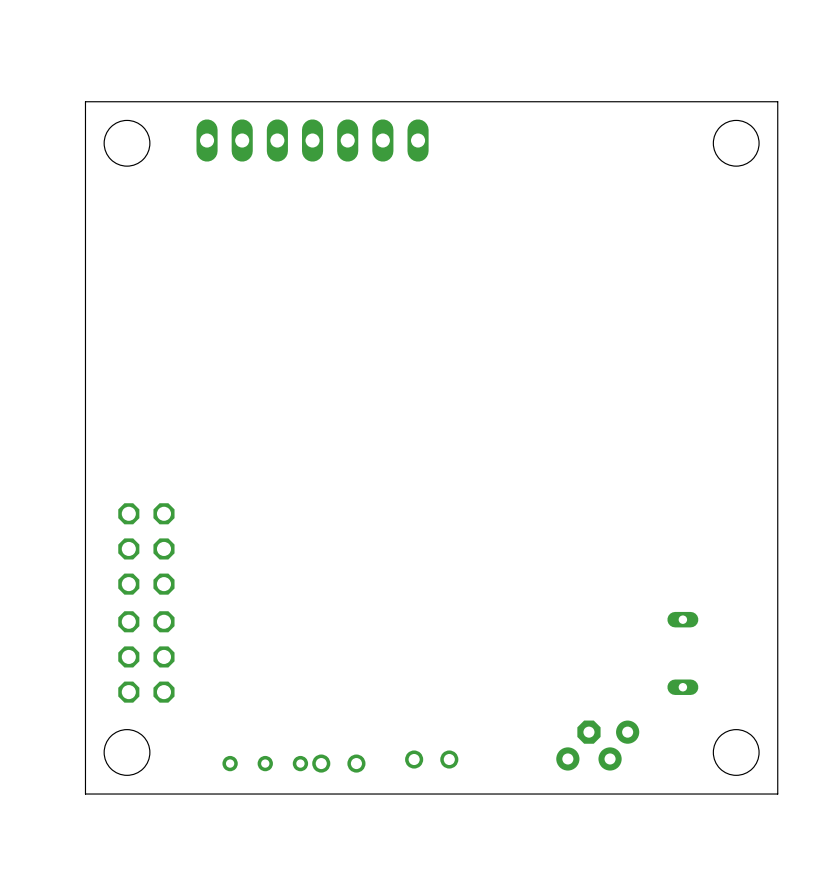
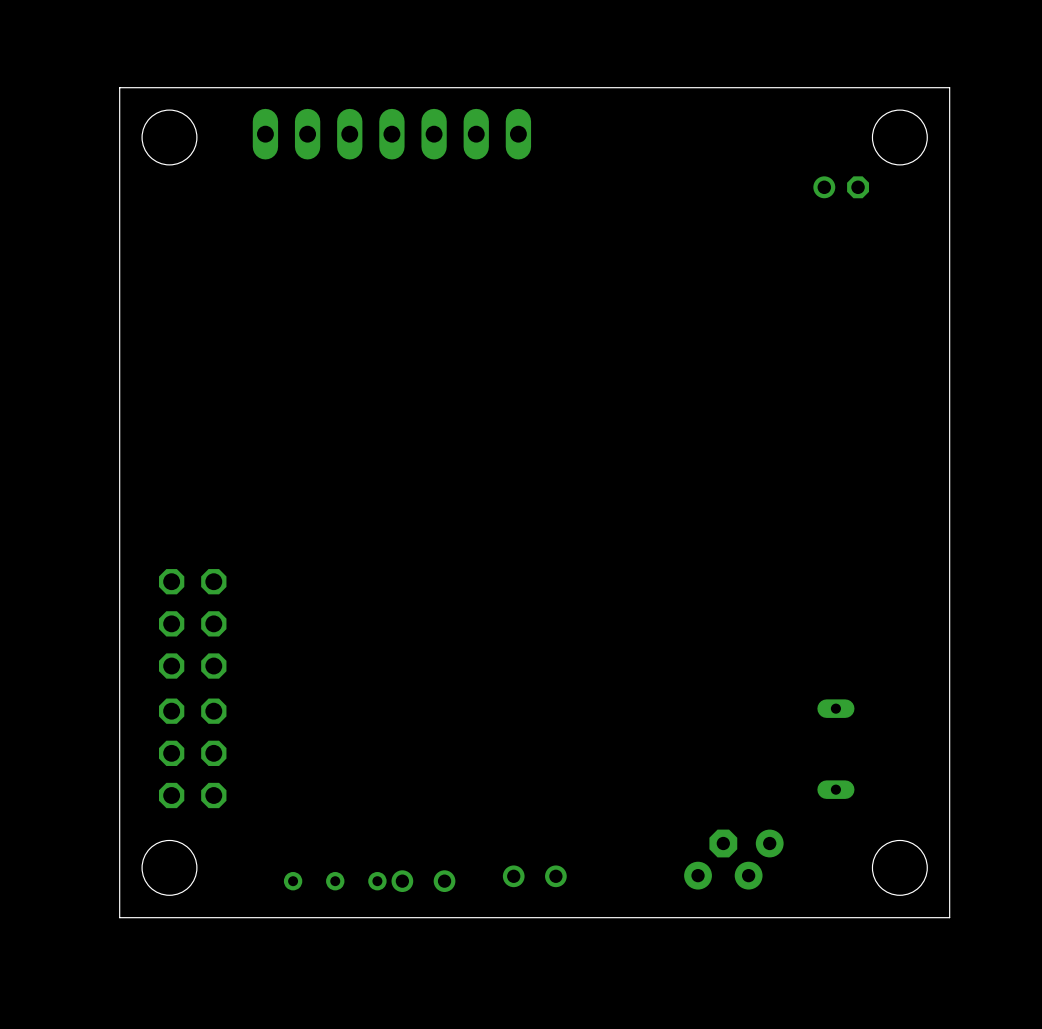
part: none -> (841, 187)

